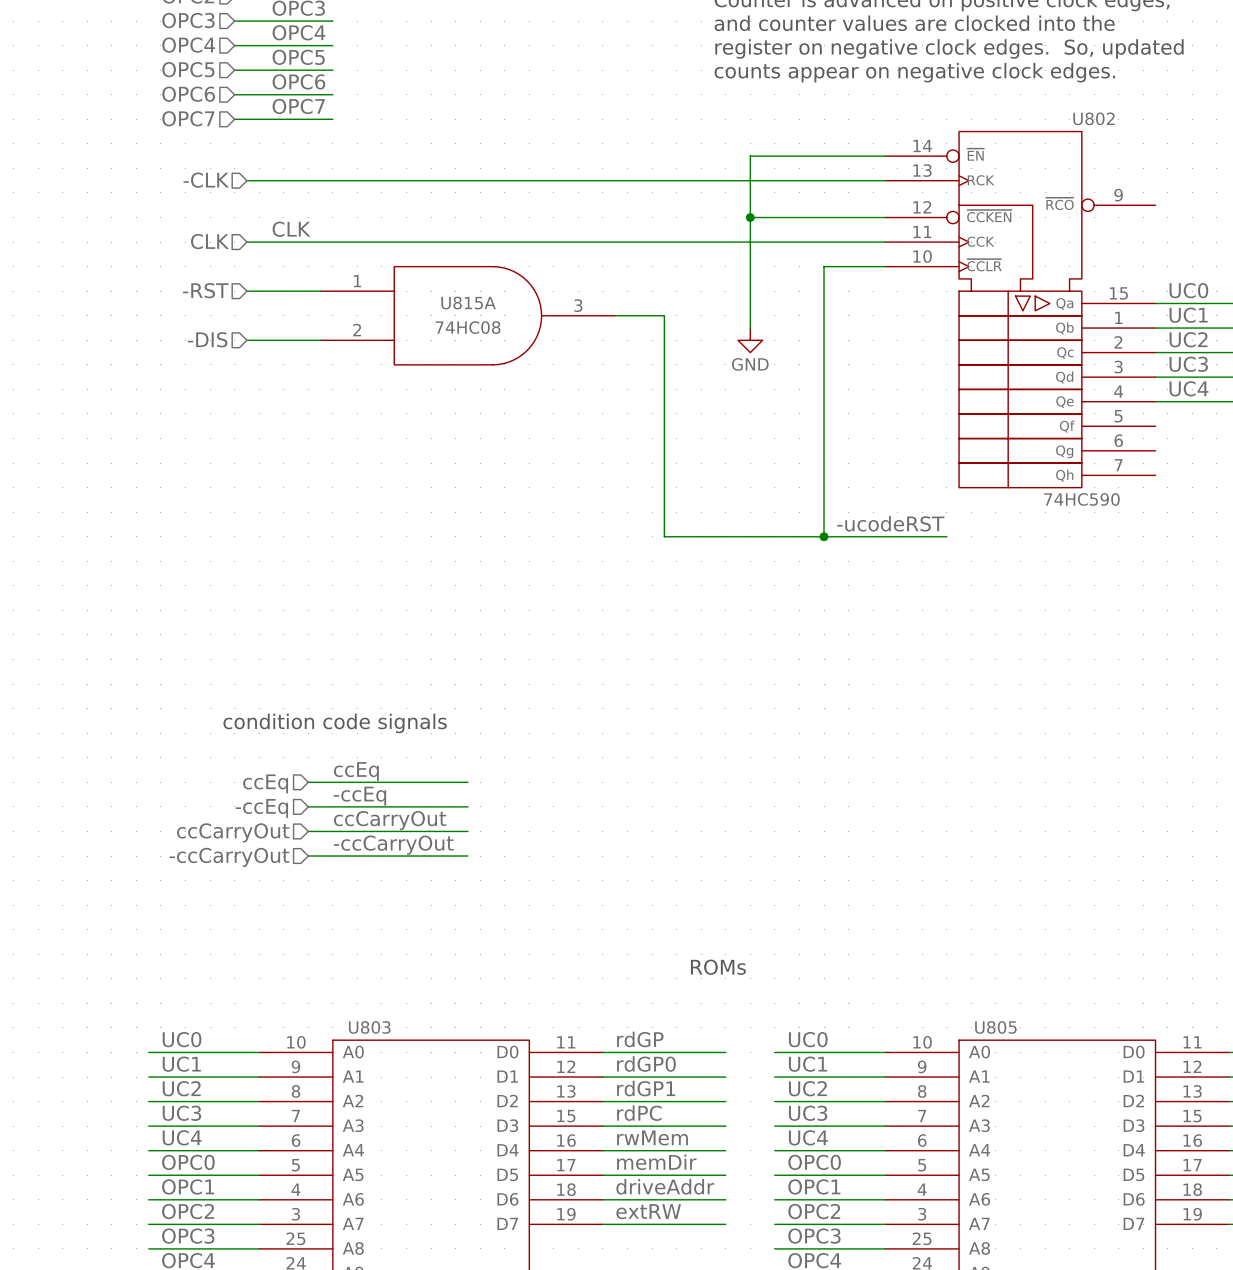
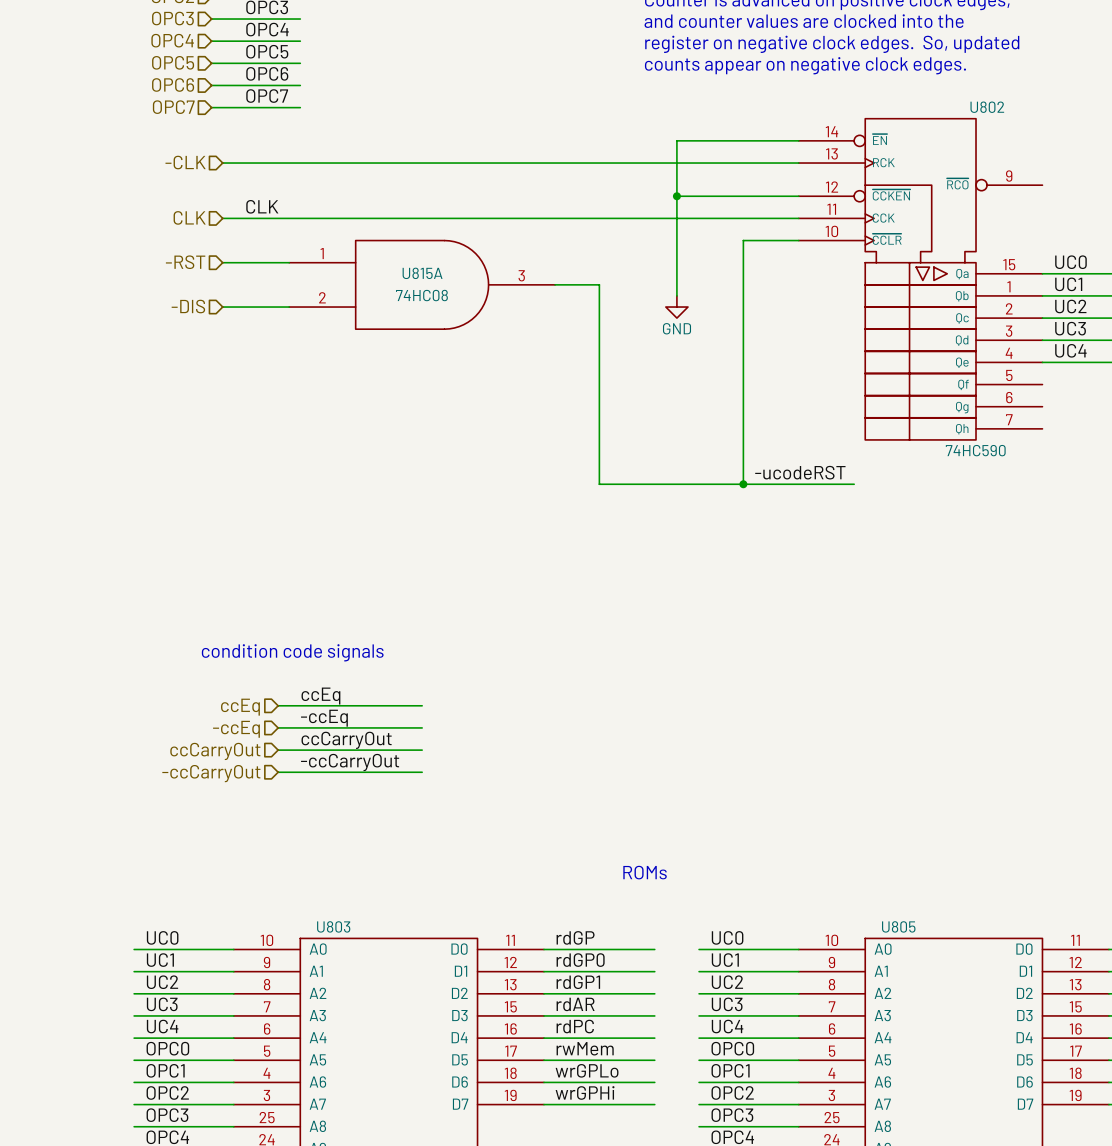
label: rdPC (639, 1113) -> rdAR (575, 1004)
label: rwMem (652, 1137) -> rdPC (575, 1026)
label: memDir (656, 1162) -> rwMem (585, 1048)
label: driveAddr (665, 1186) -> wrGPLo (587, 1070)
label: extRW (648, 1211) -> wrGPHi (585, 1092)

